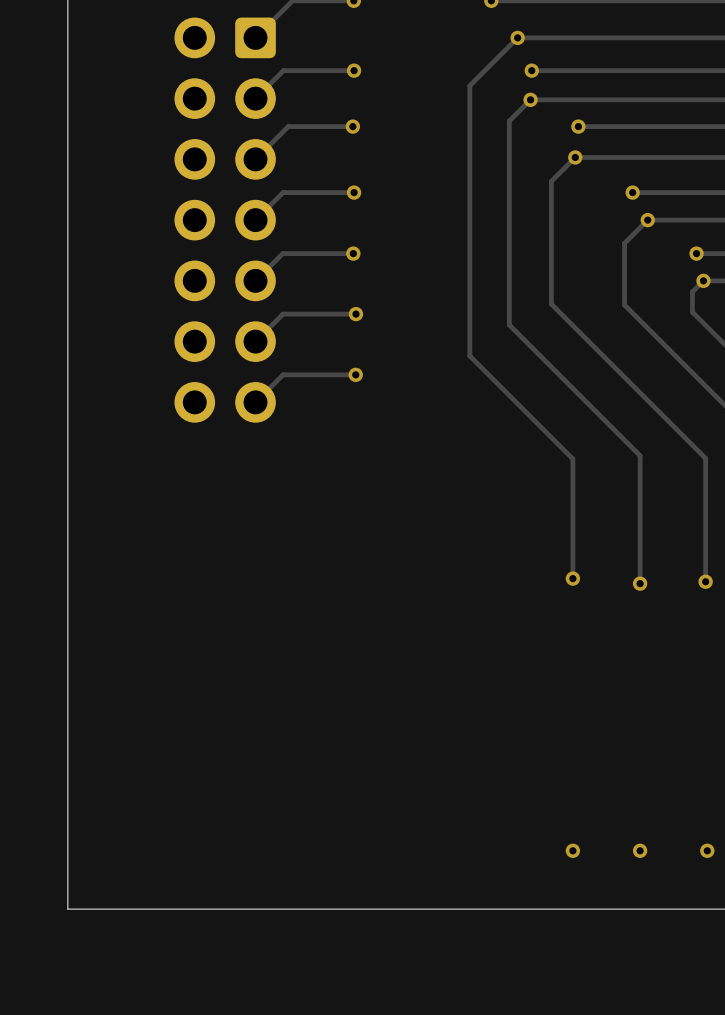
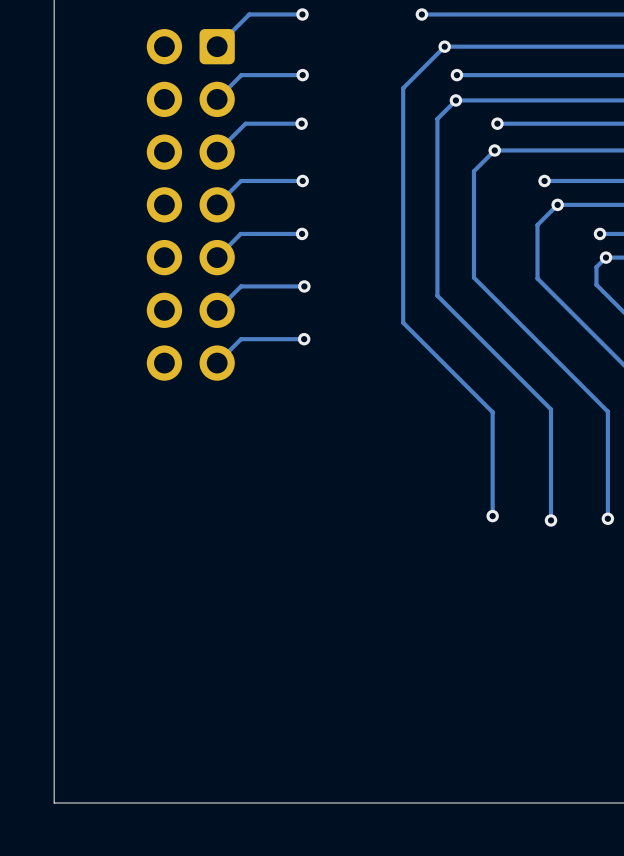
via: (572, 850) -> none
via: (640, 850) -> none
via: (707, 850) -> none

